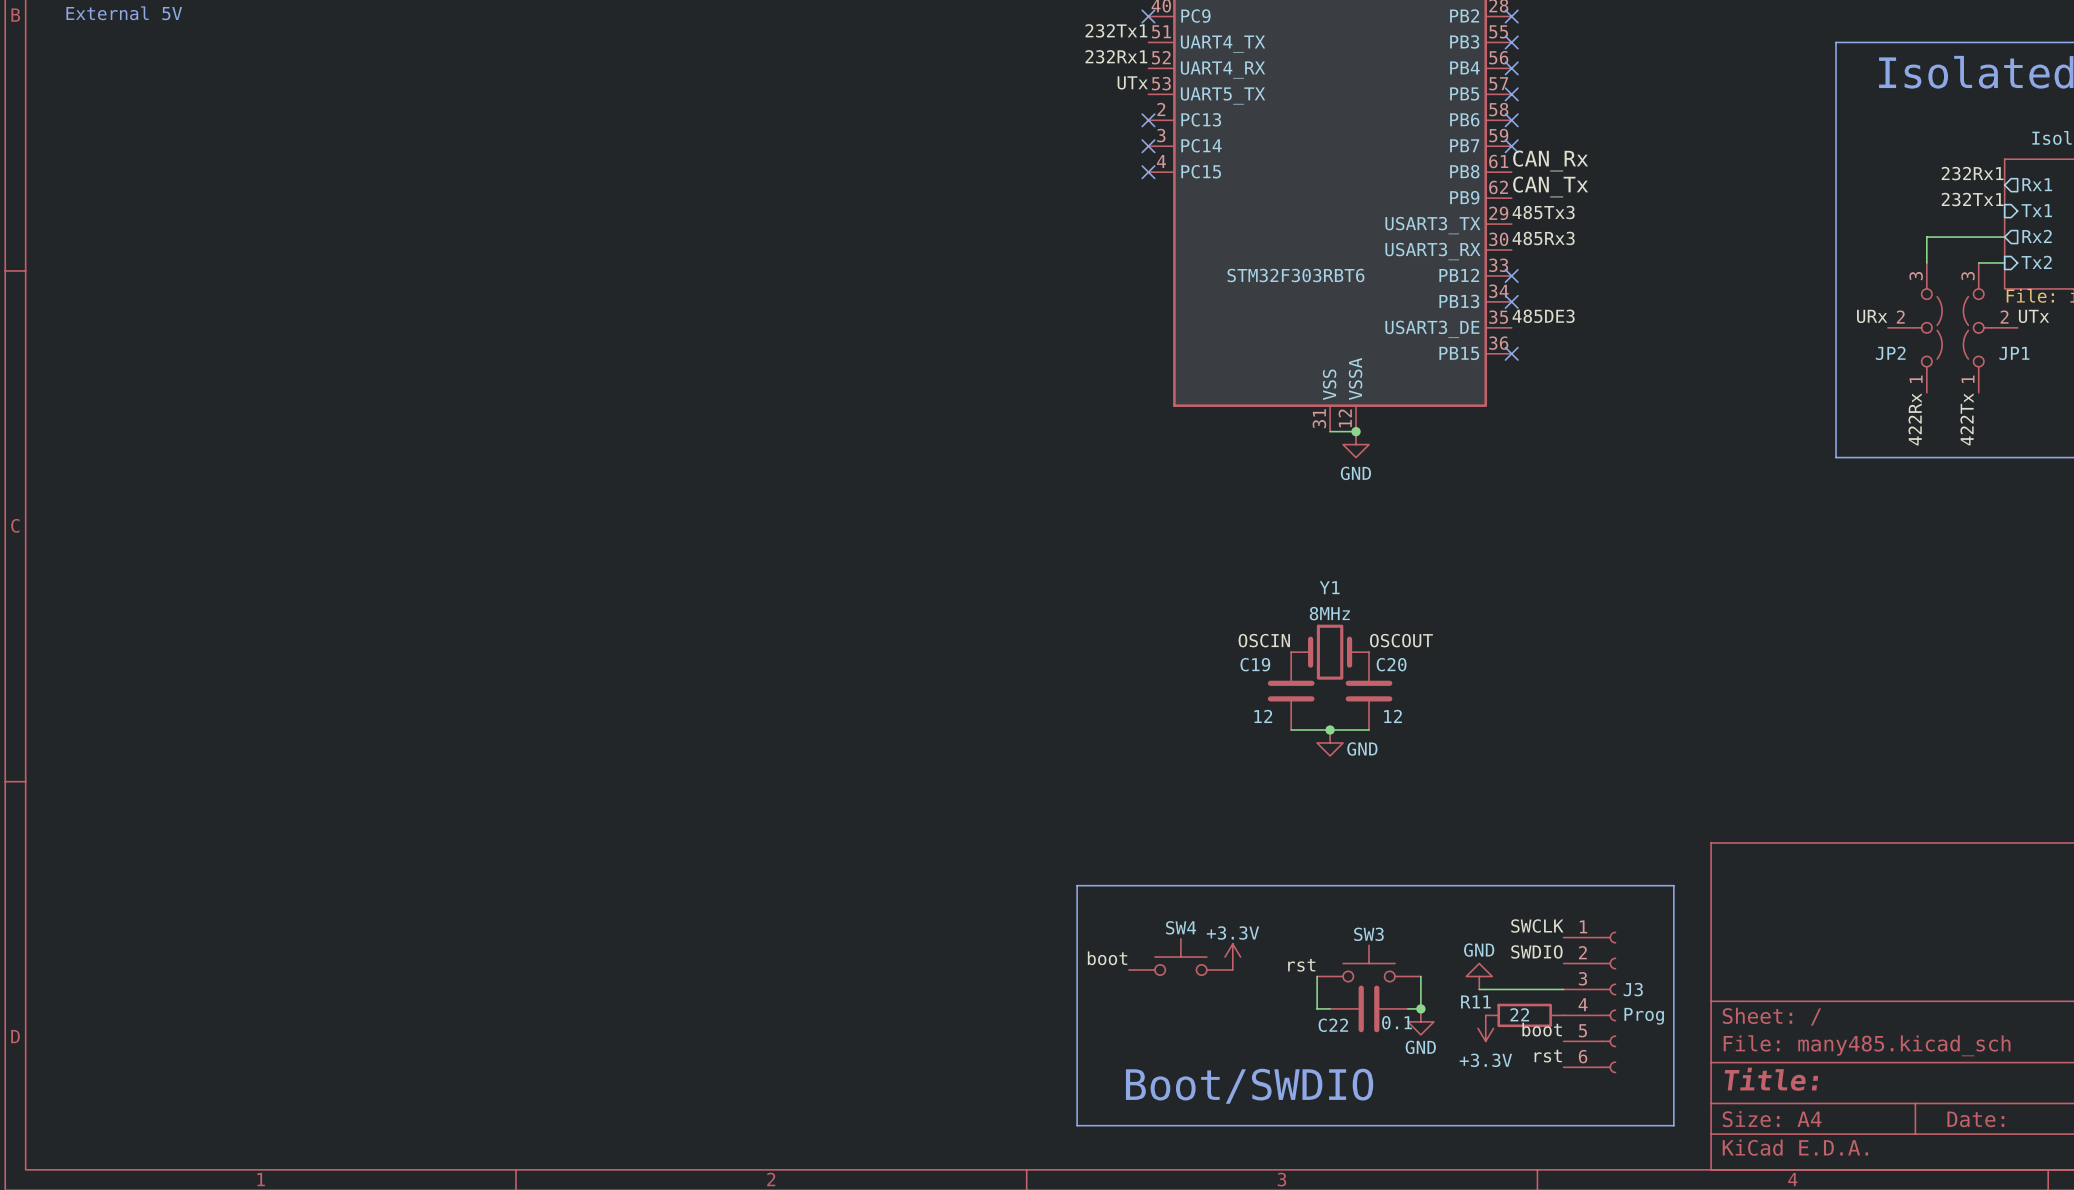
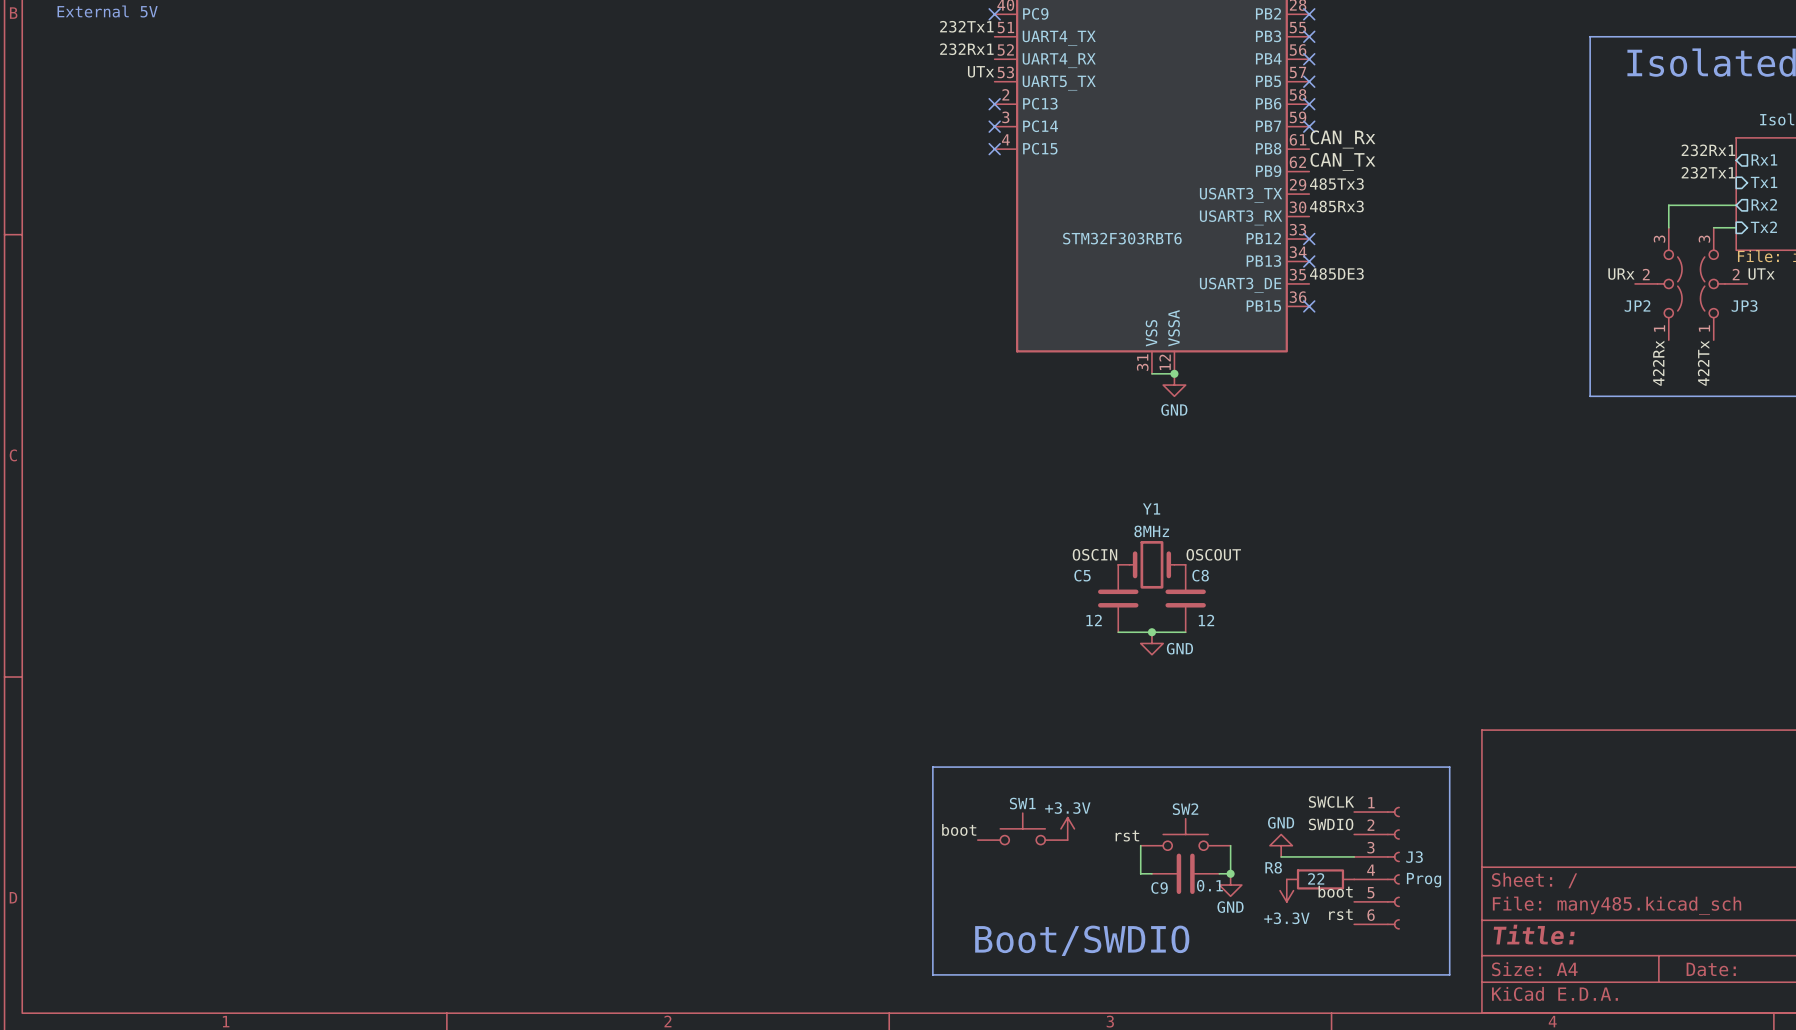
JP1 name: JP1 (2014, 353) -> JP3 (1744, 306)
C19 name: C19 (1255, 664) -> C5 (1082, 575)
C20 name: C20 (1391, 664) -> C8 (1200, 575)
SW4 name: SW4 (1181, 927) -> SW1 (1022, 803)
SW3 name: SW3 (1368, 934) -> SW2 (1185, 809)
R11 name: R11 (1475, 1001) -> R8 (1273, 867)
C22 name: C22 (1333, 1025) -> C9 (1159, 888)

